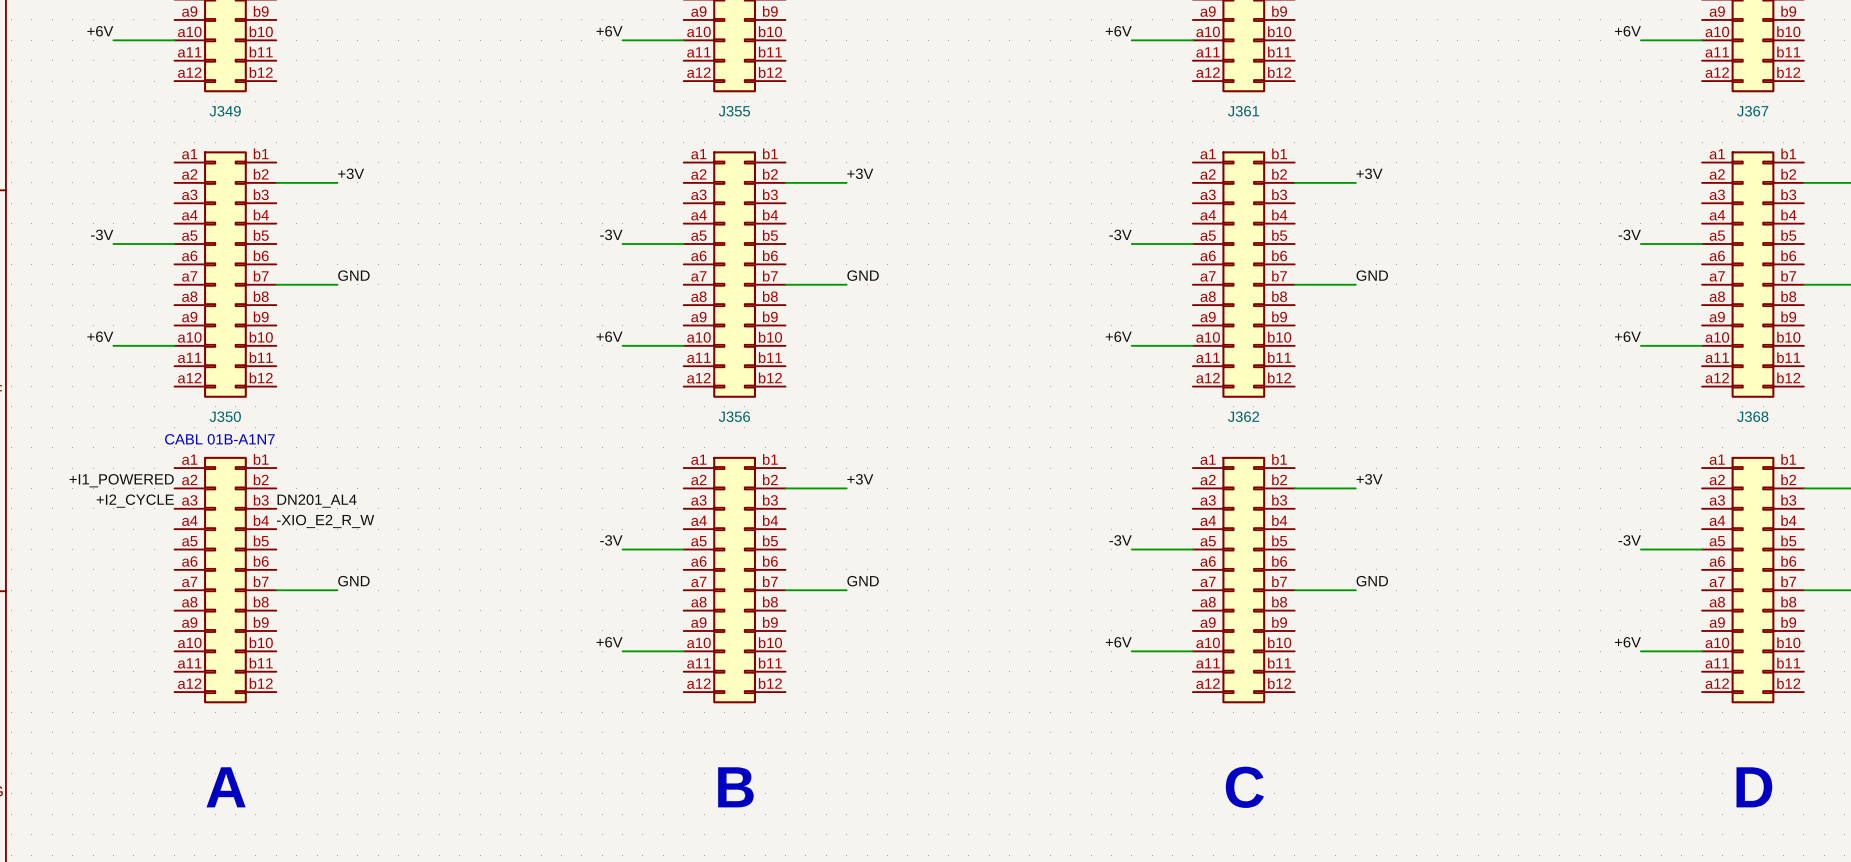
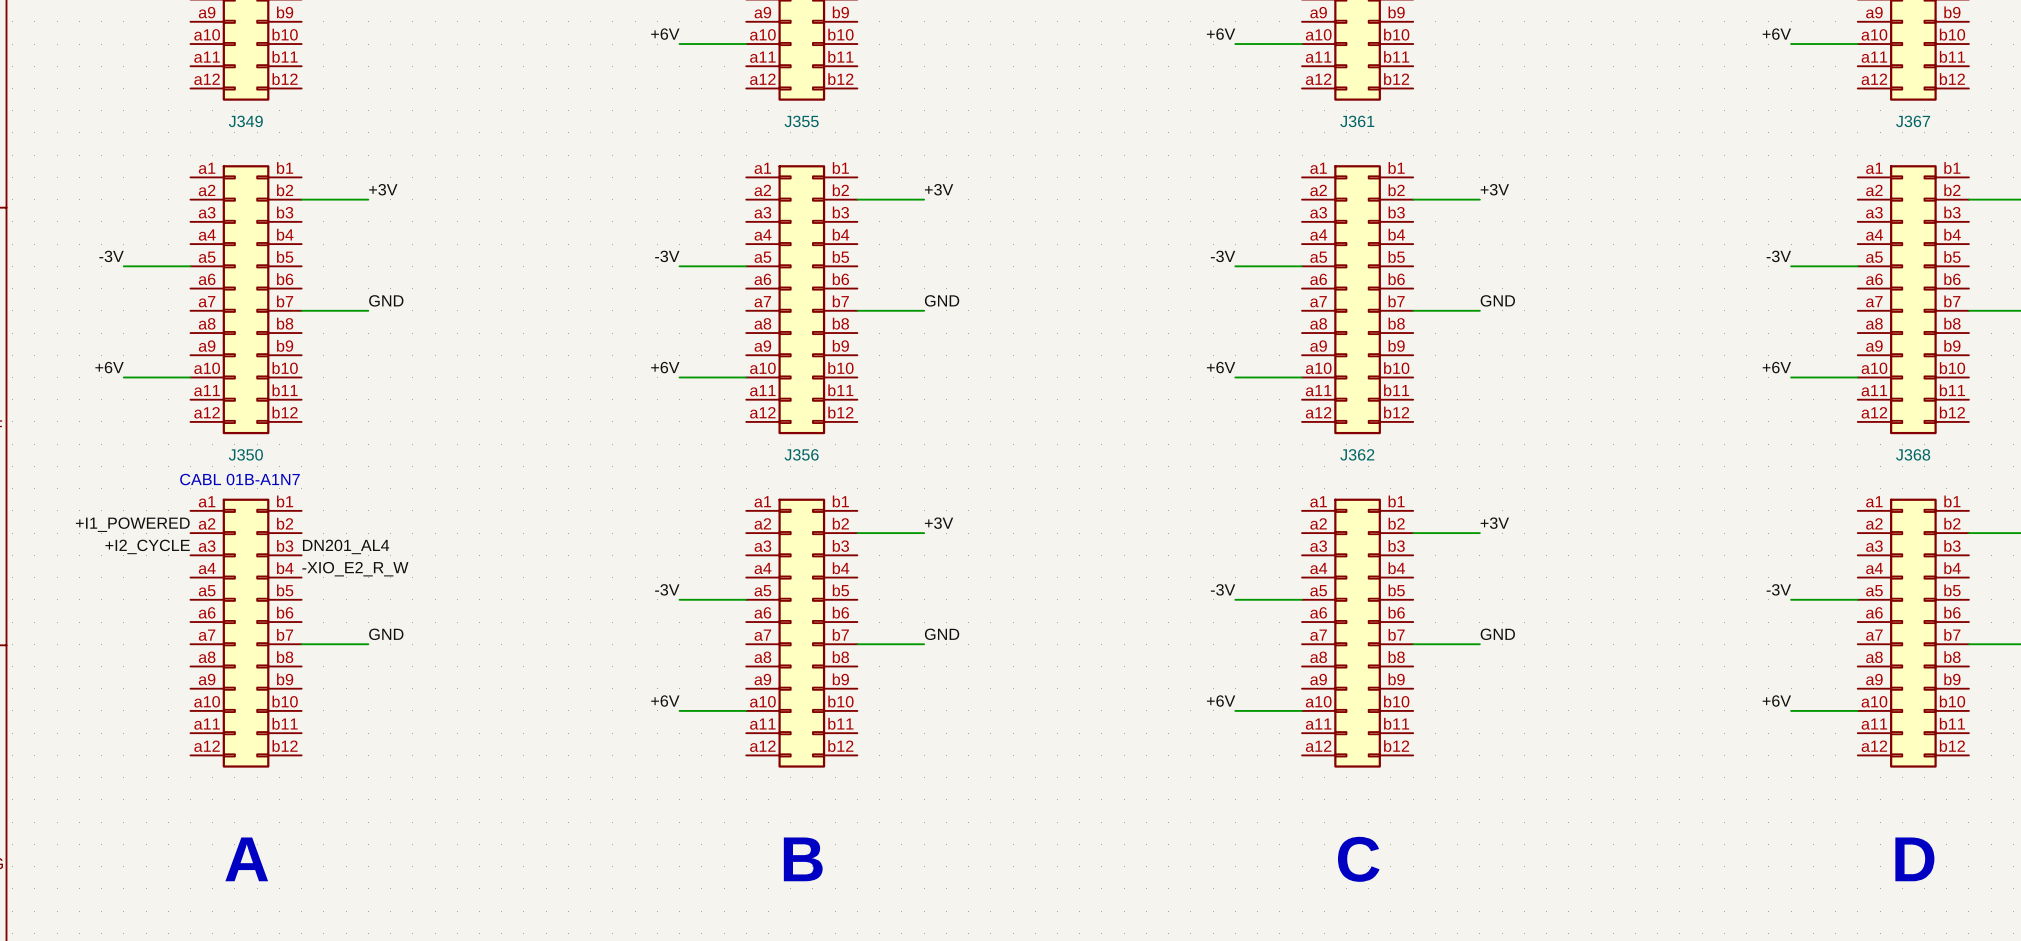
label: +6V (100, 31) -> none
wire: (113, 40) (174, 40) -> none

